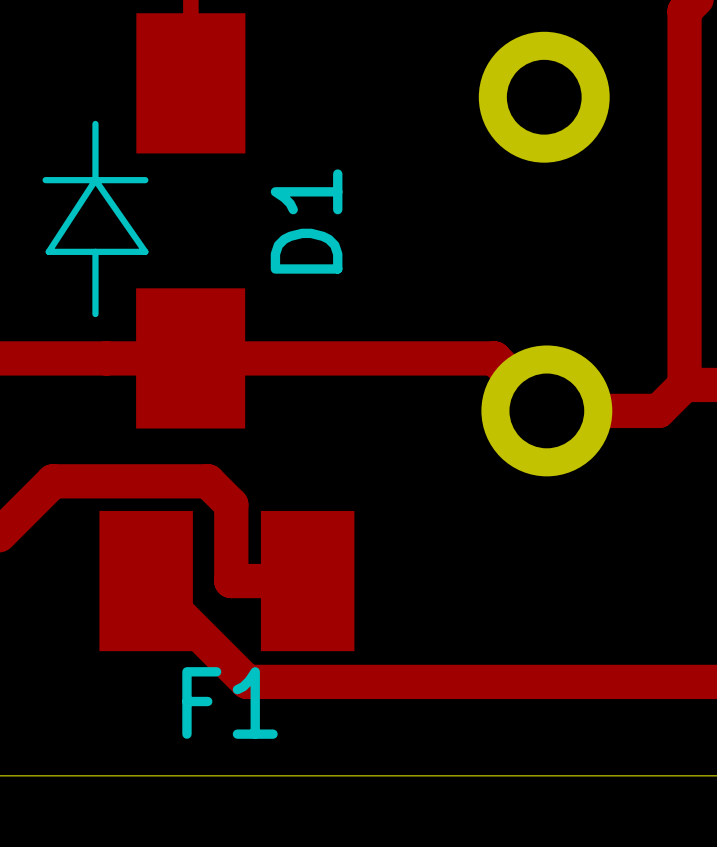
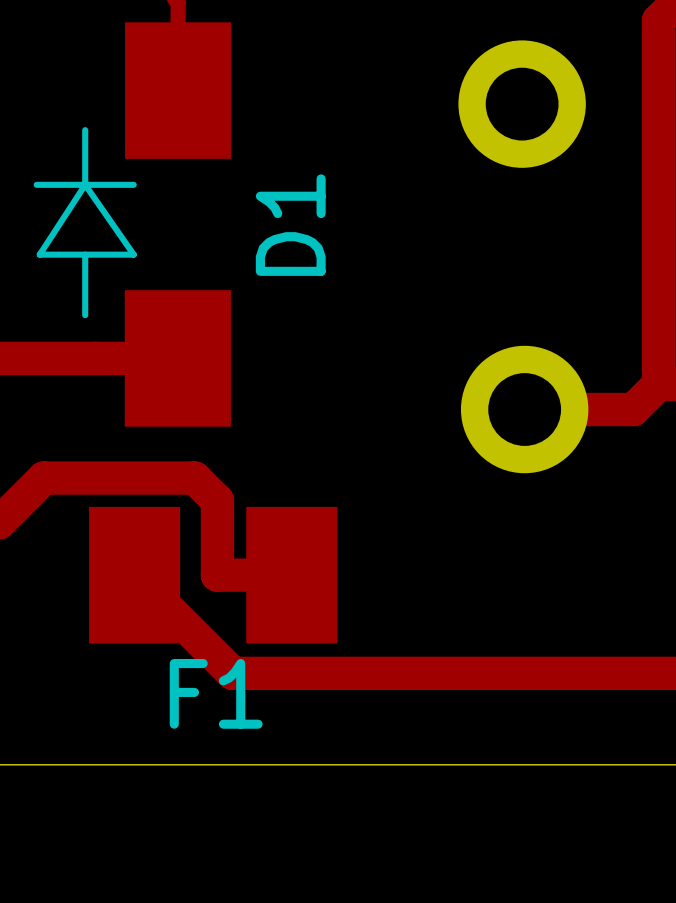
track: (190, 358) (494, 358) (546, 410) -> none

